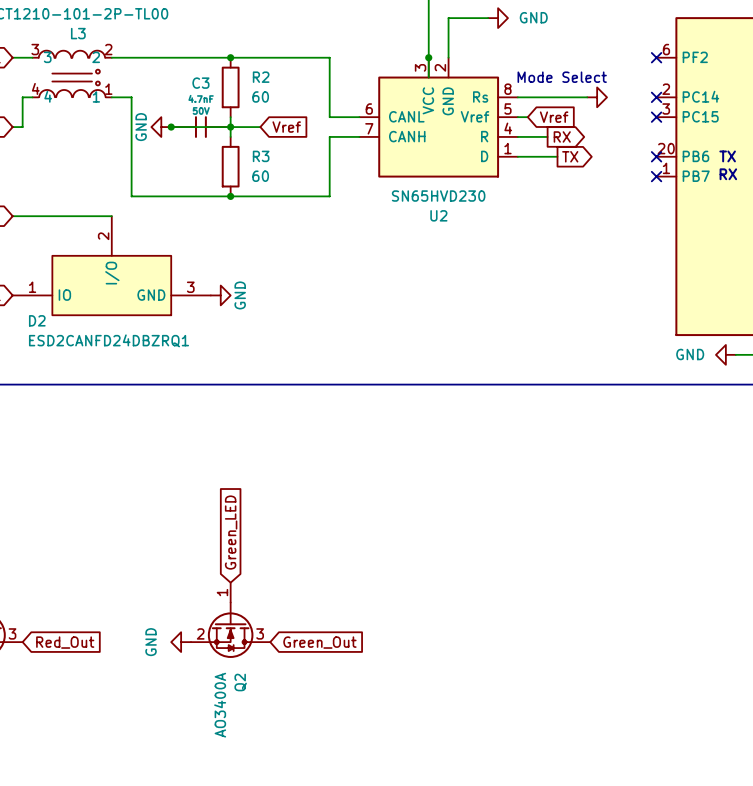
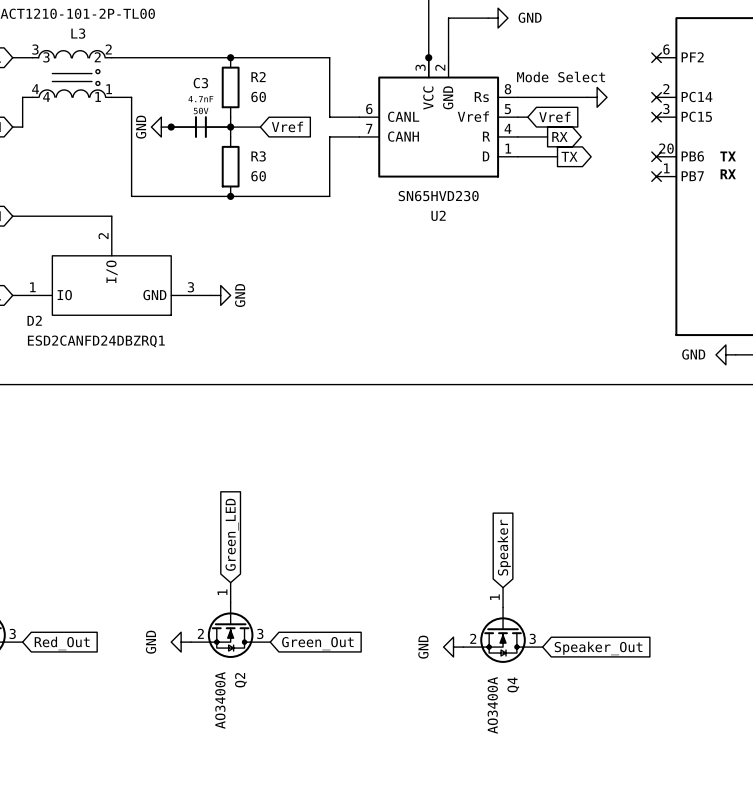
global label: none -> Speaker (504, 547)
Q4: none -> AO3400A (503, 625)
power symbol: none -> GND (453, 647)
global label: none -> Speaker_Out (598, 648)

